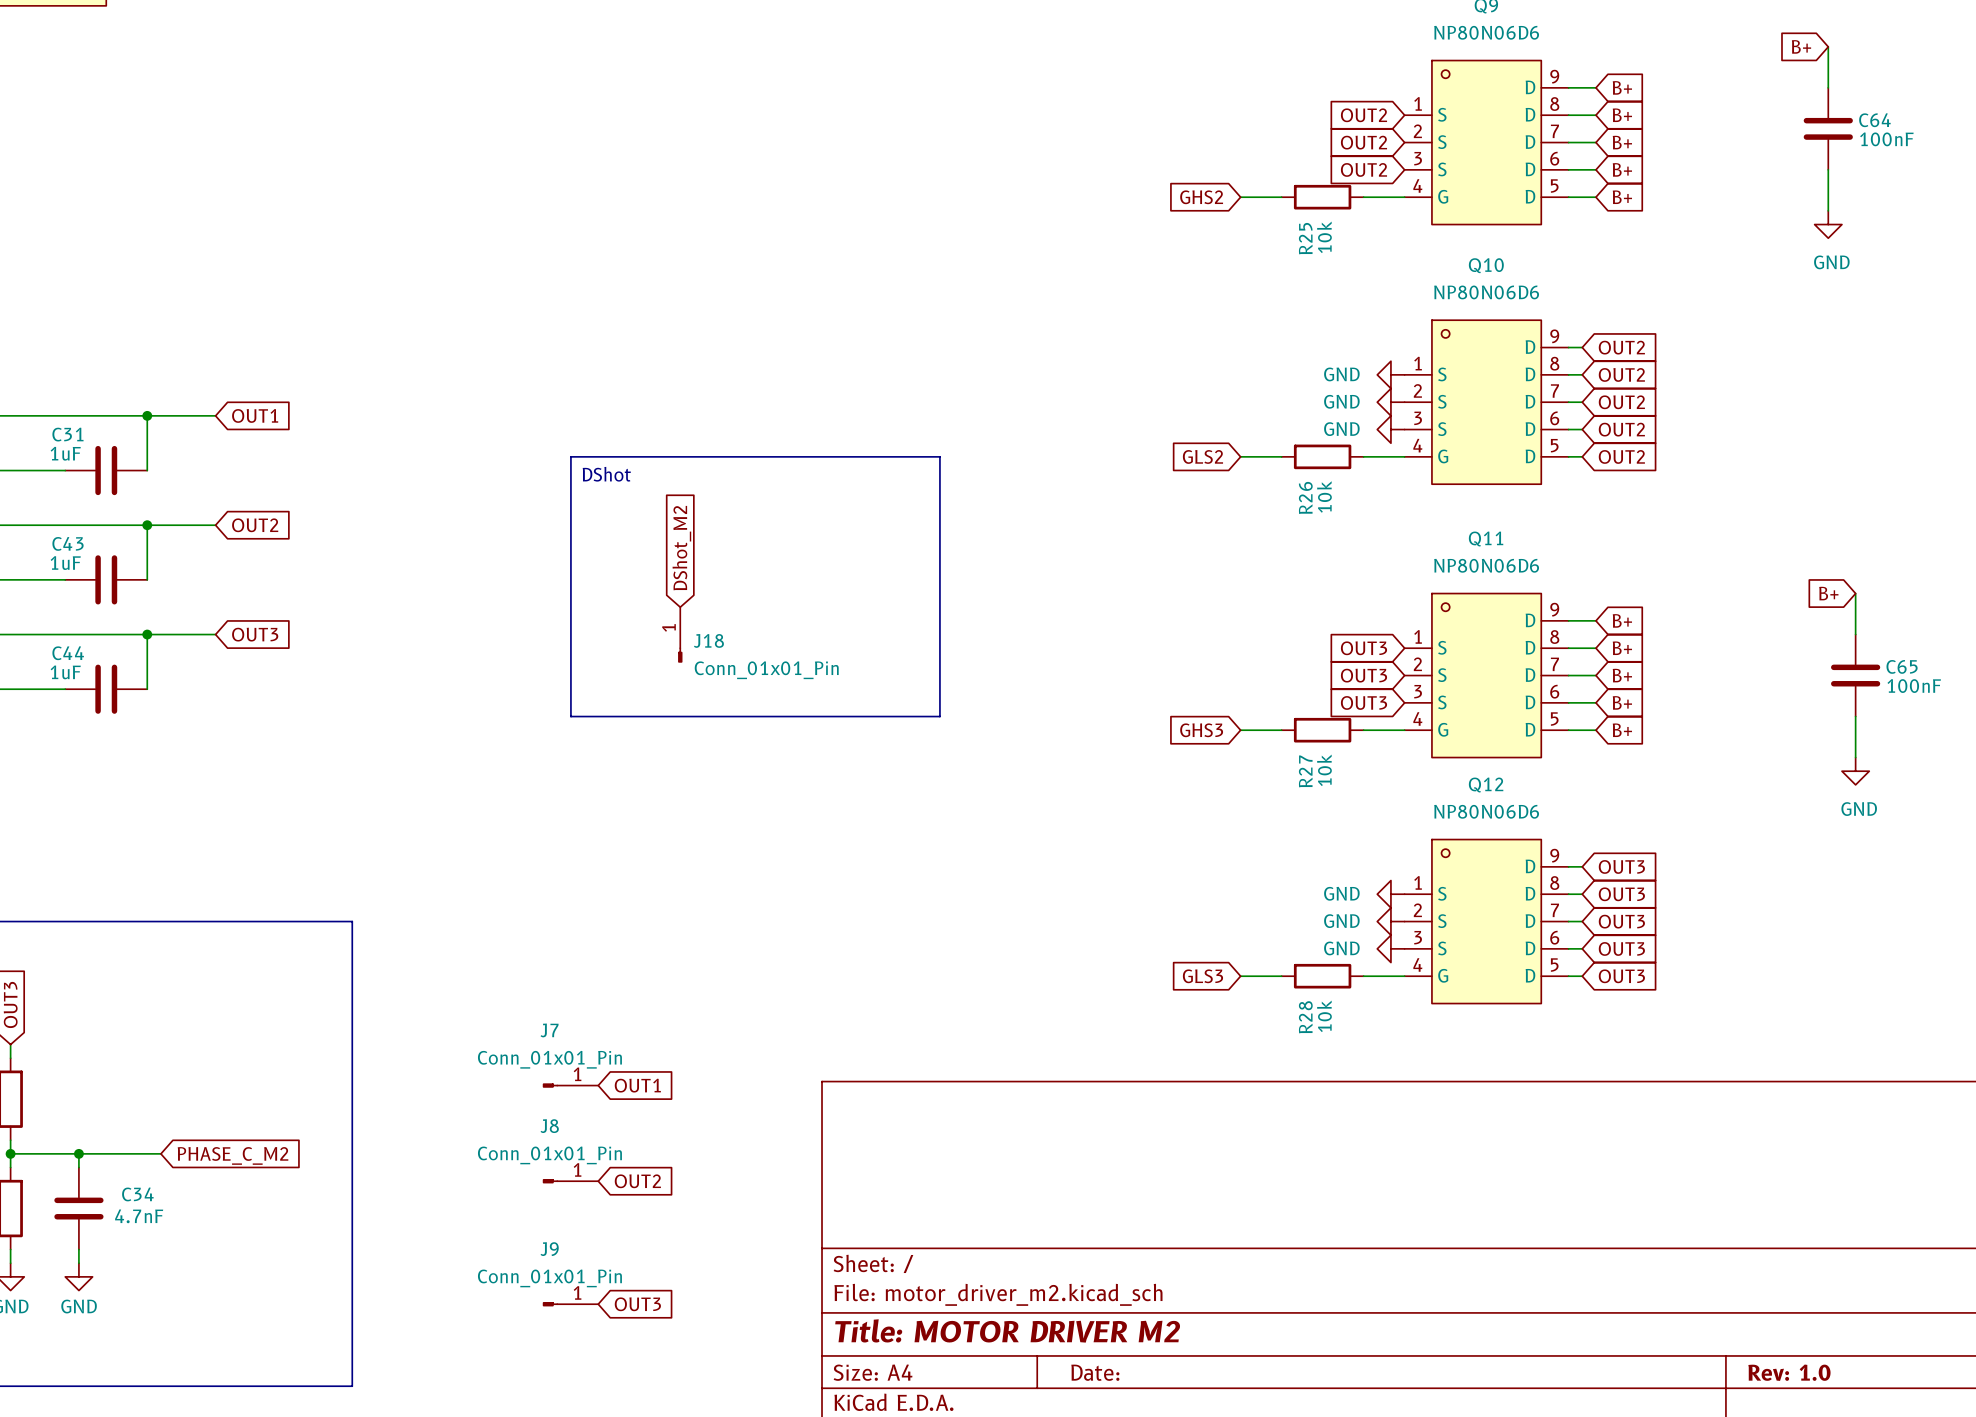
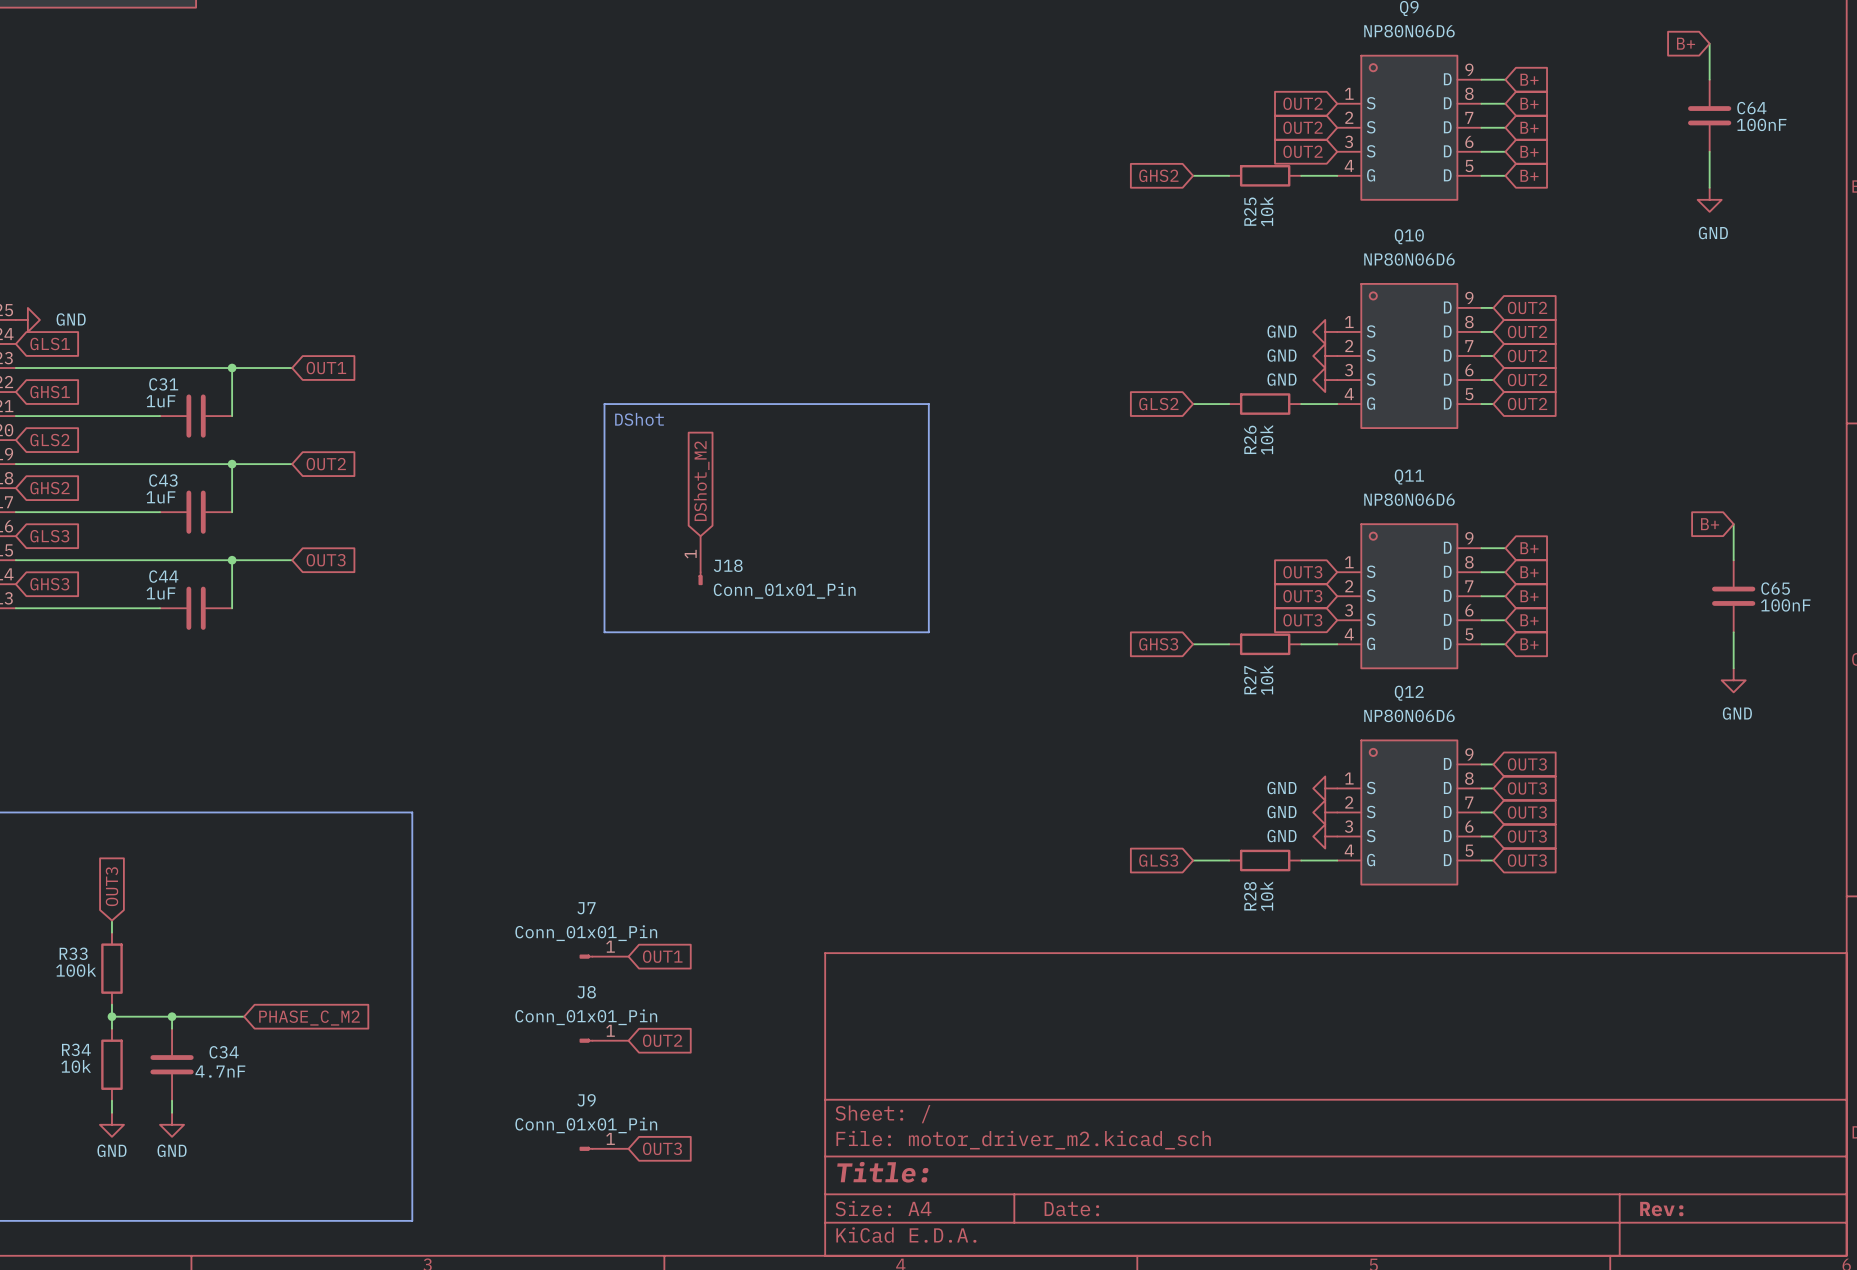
title block: Title: MOTOR DRIVER M2 (1007, 1330) -> Title: (882, 1172)
title block: Rev: 1.0 (1789, 1372) -> Rev: (1661, 1209)

